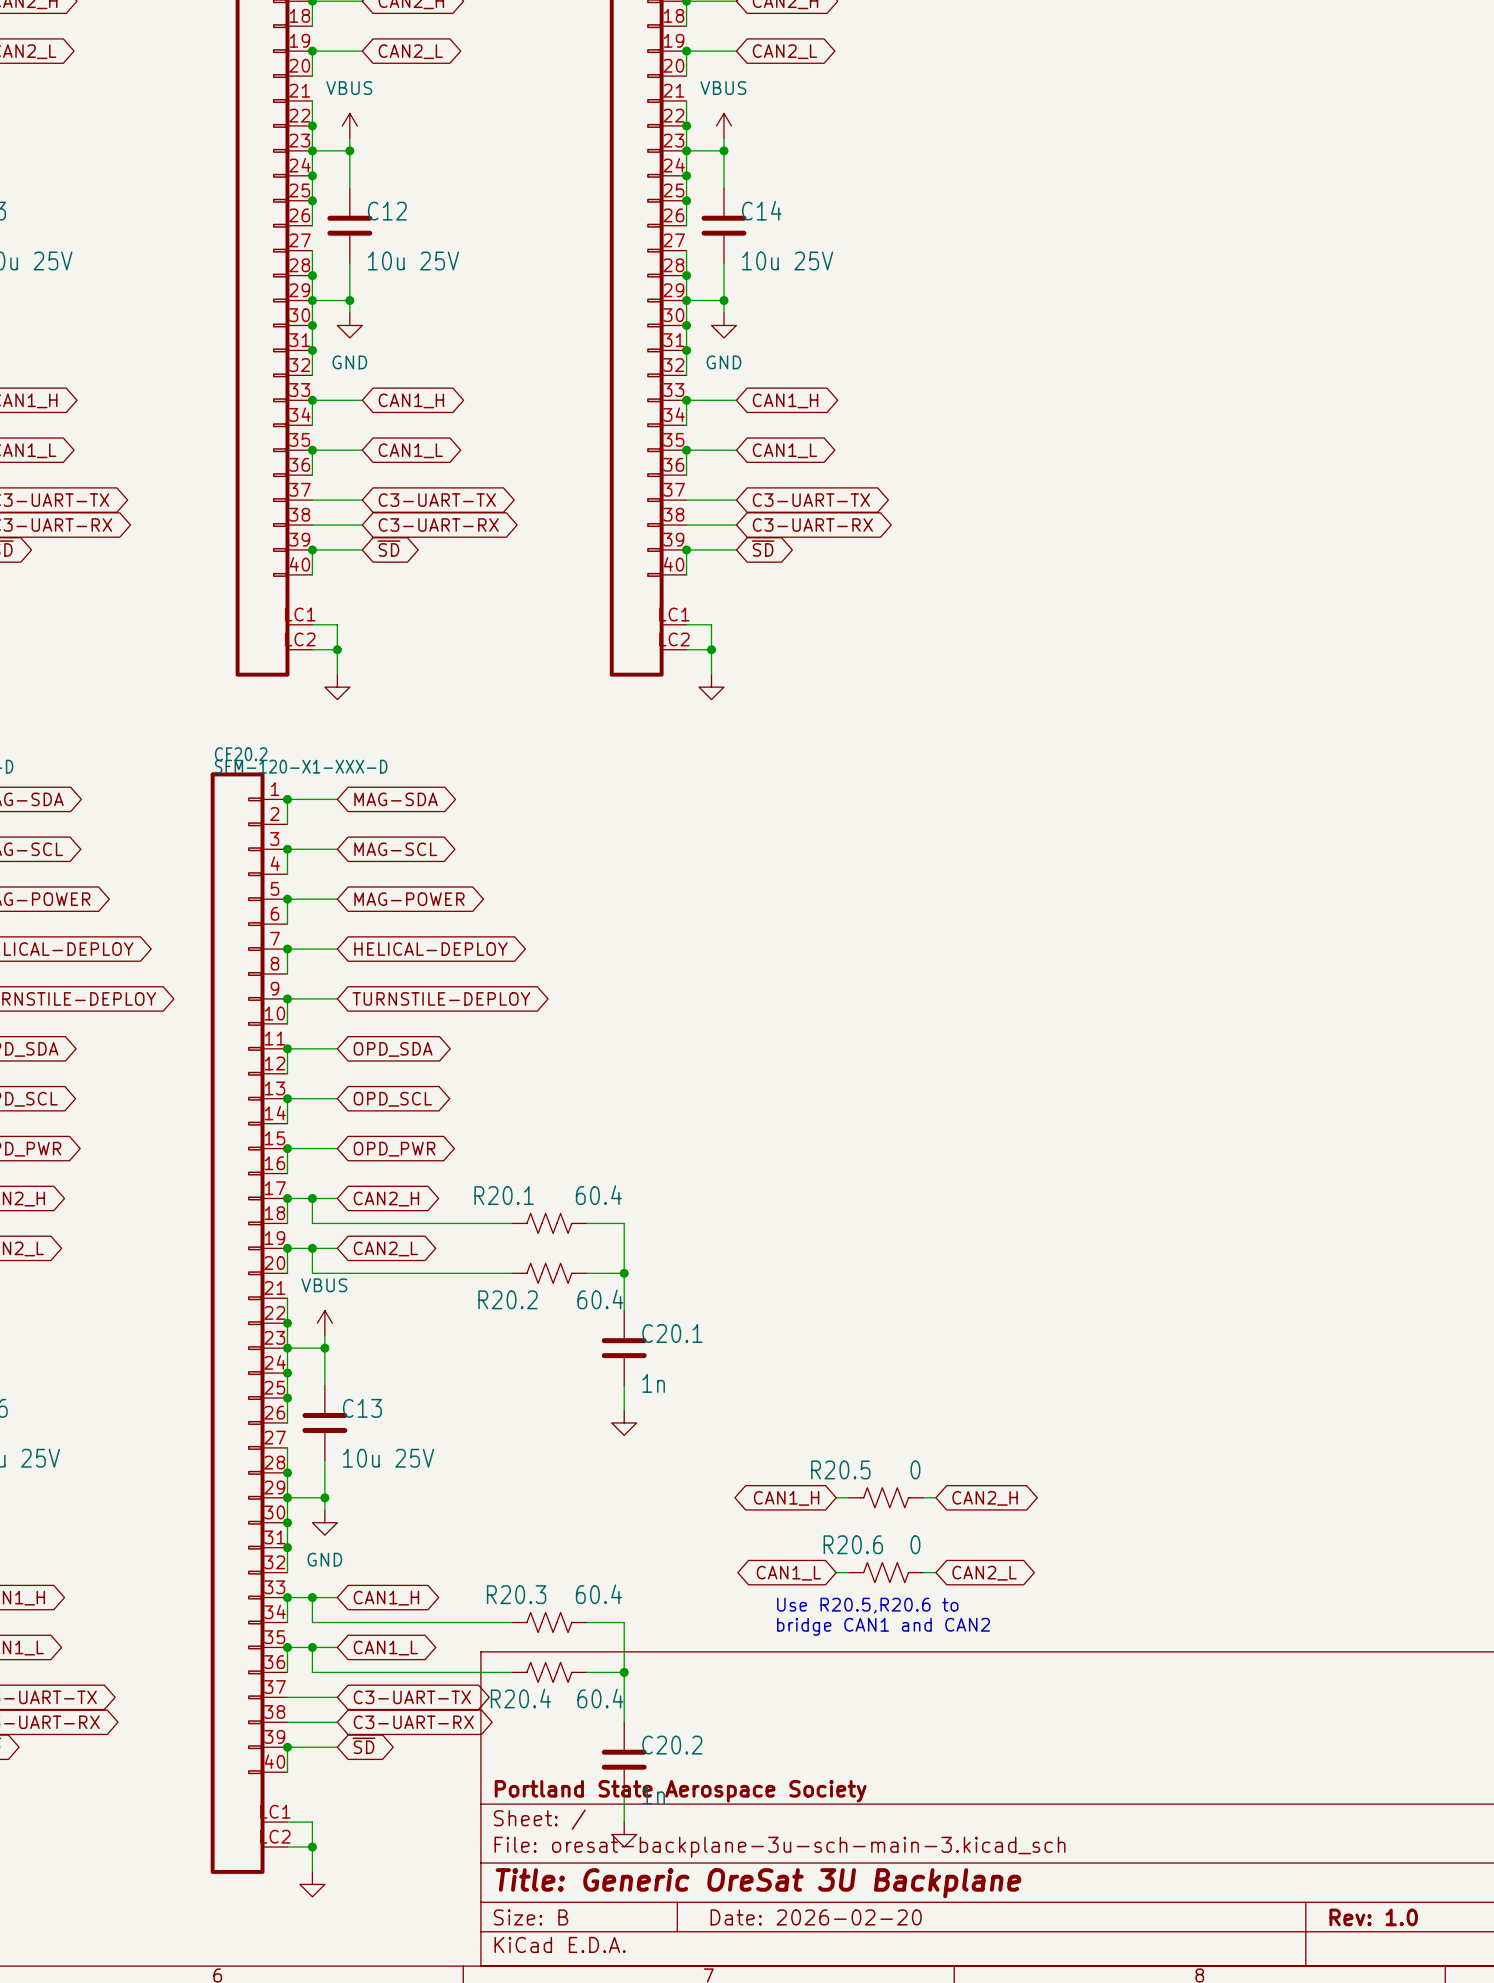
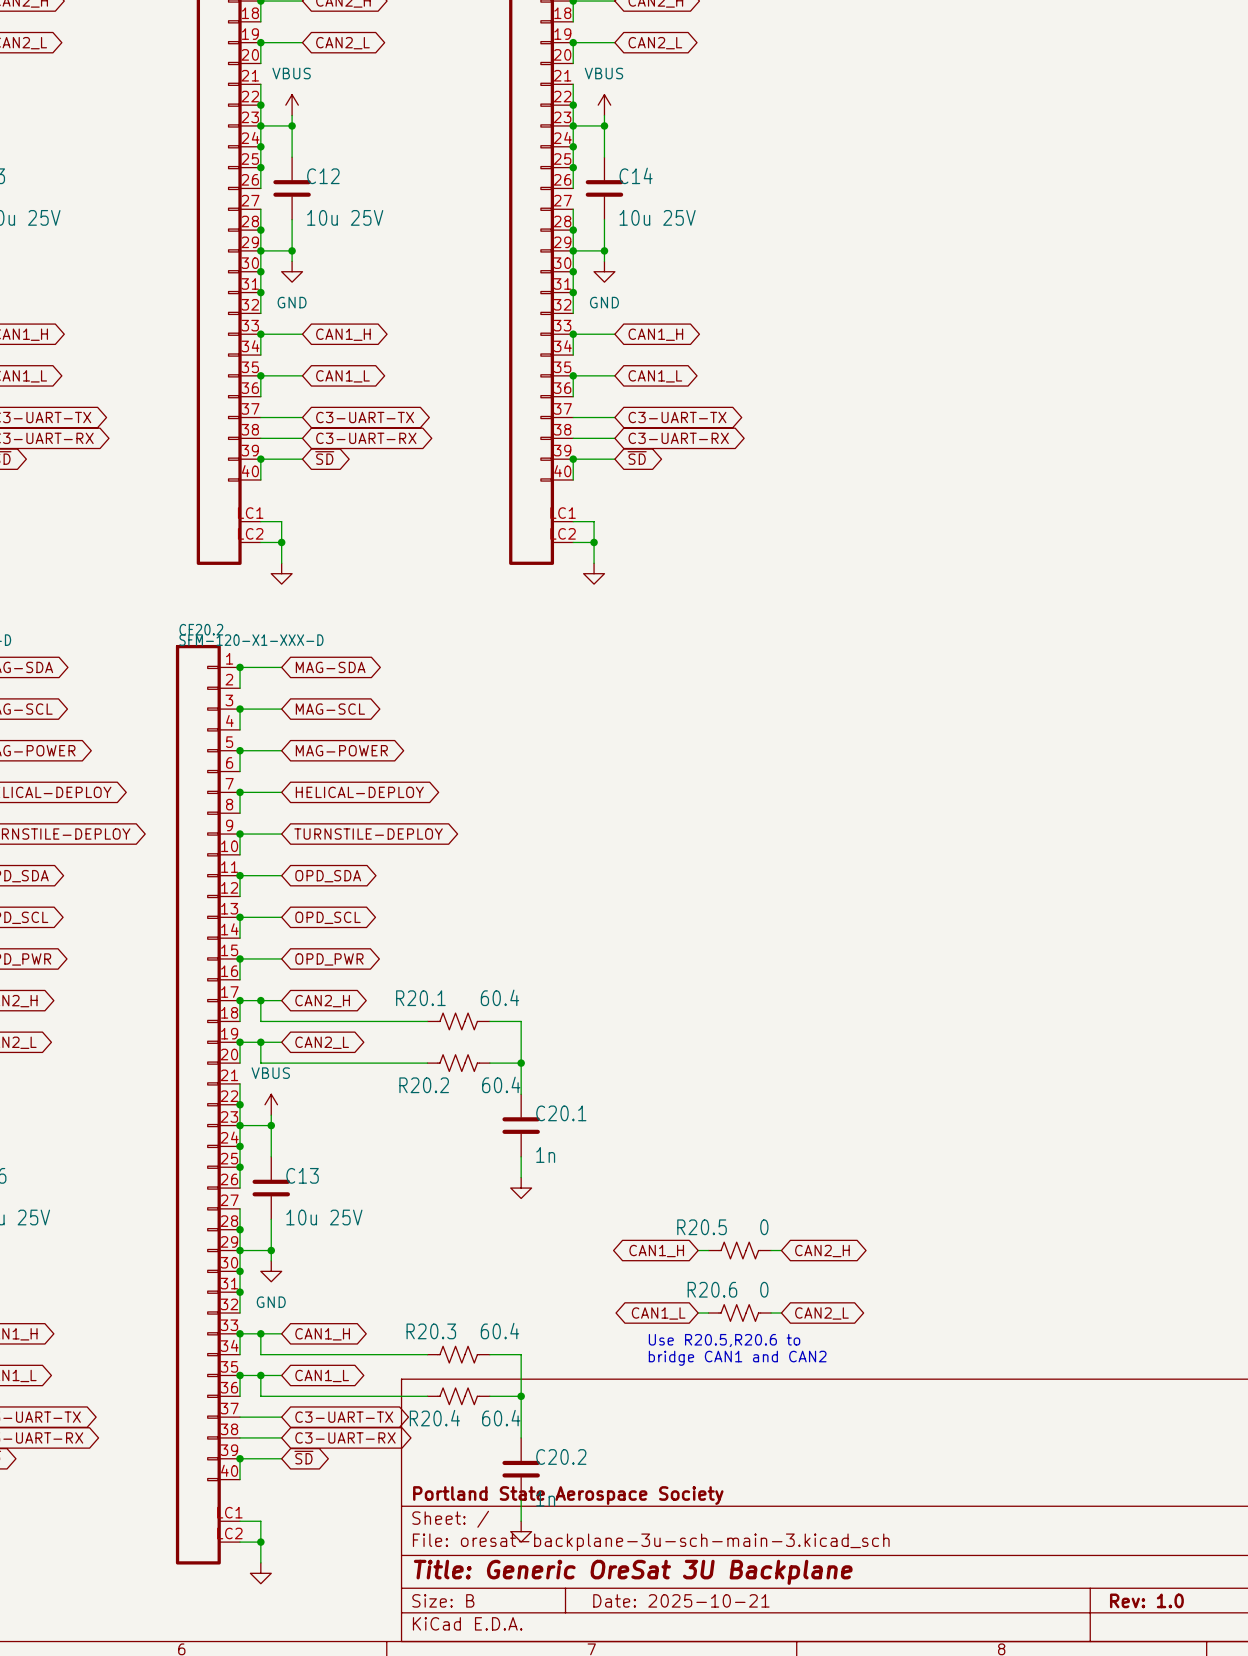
title block: Date: 2026-02-20 (816, 1917) -> Date: 2025-10-21 (681, 1600)

